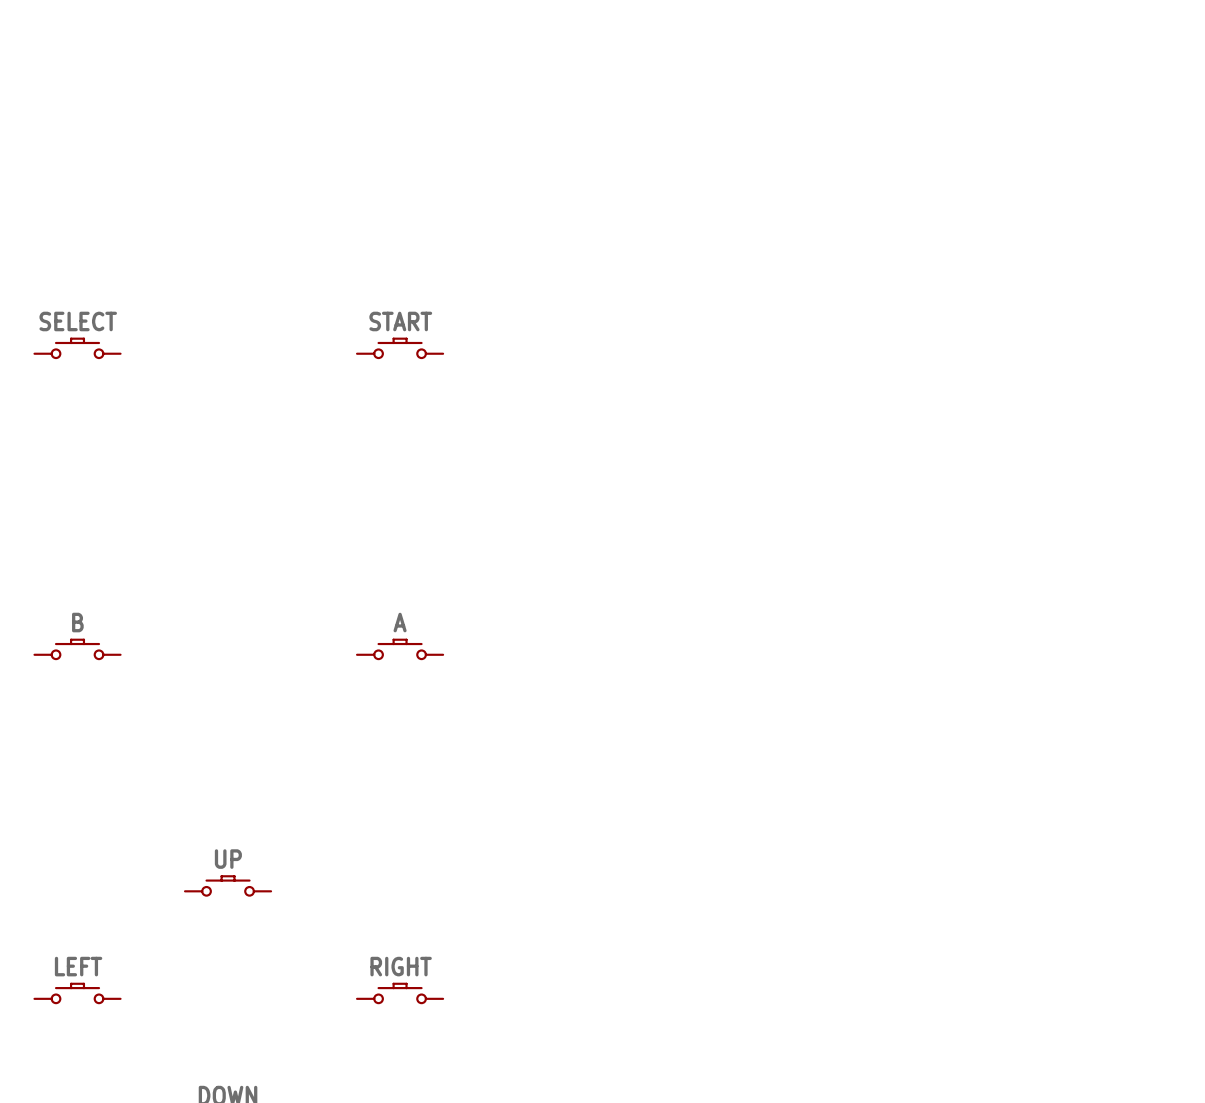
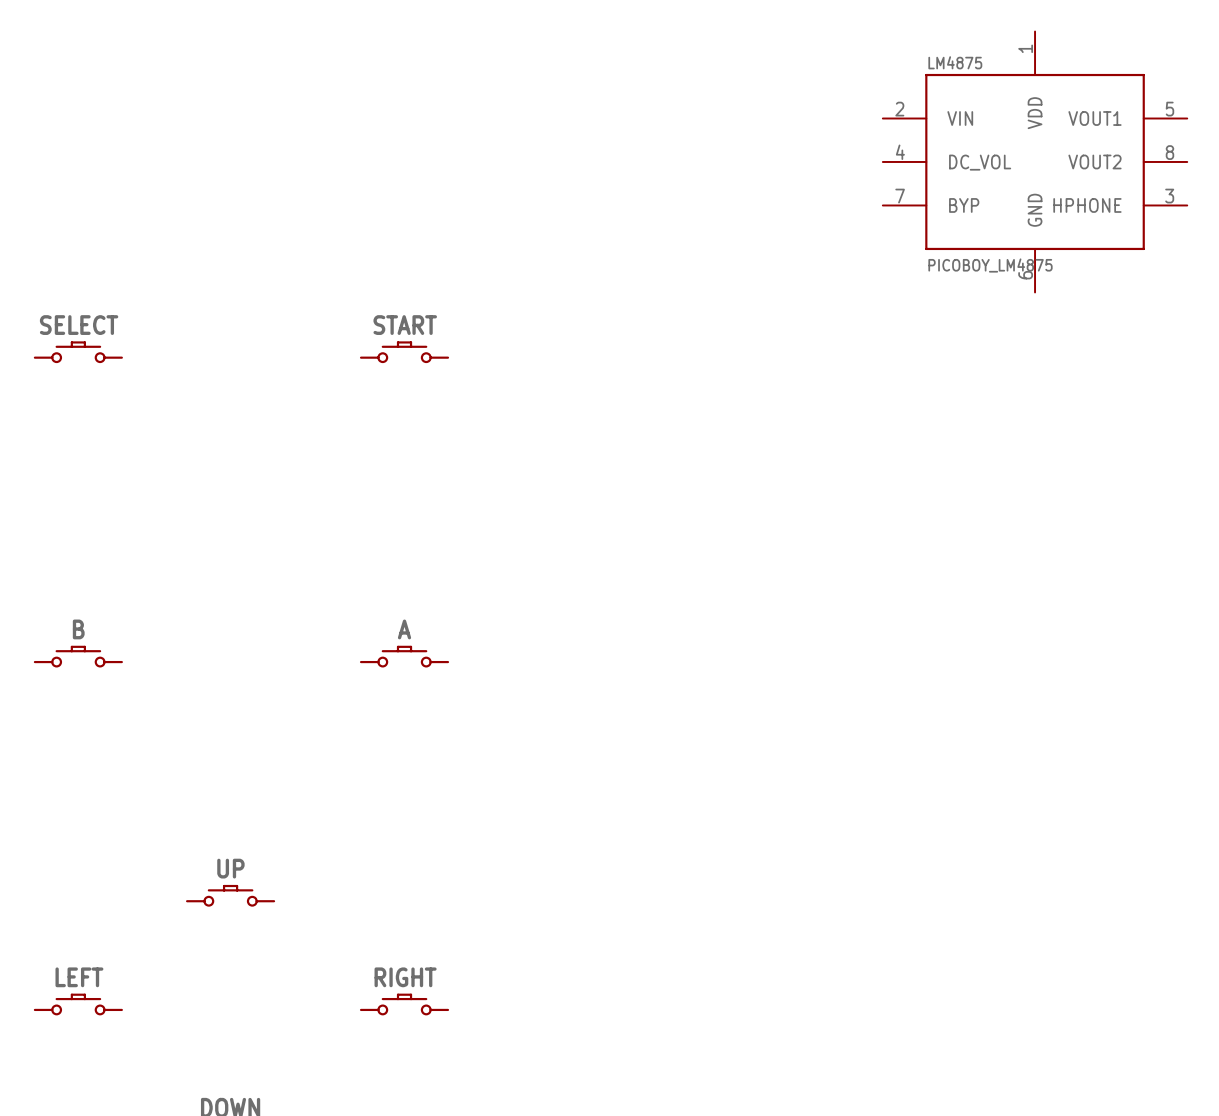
LM4875: none -> PICOBOY_LM4875 (1035, 161)

